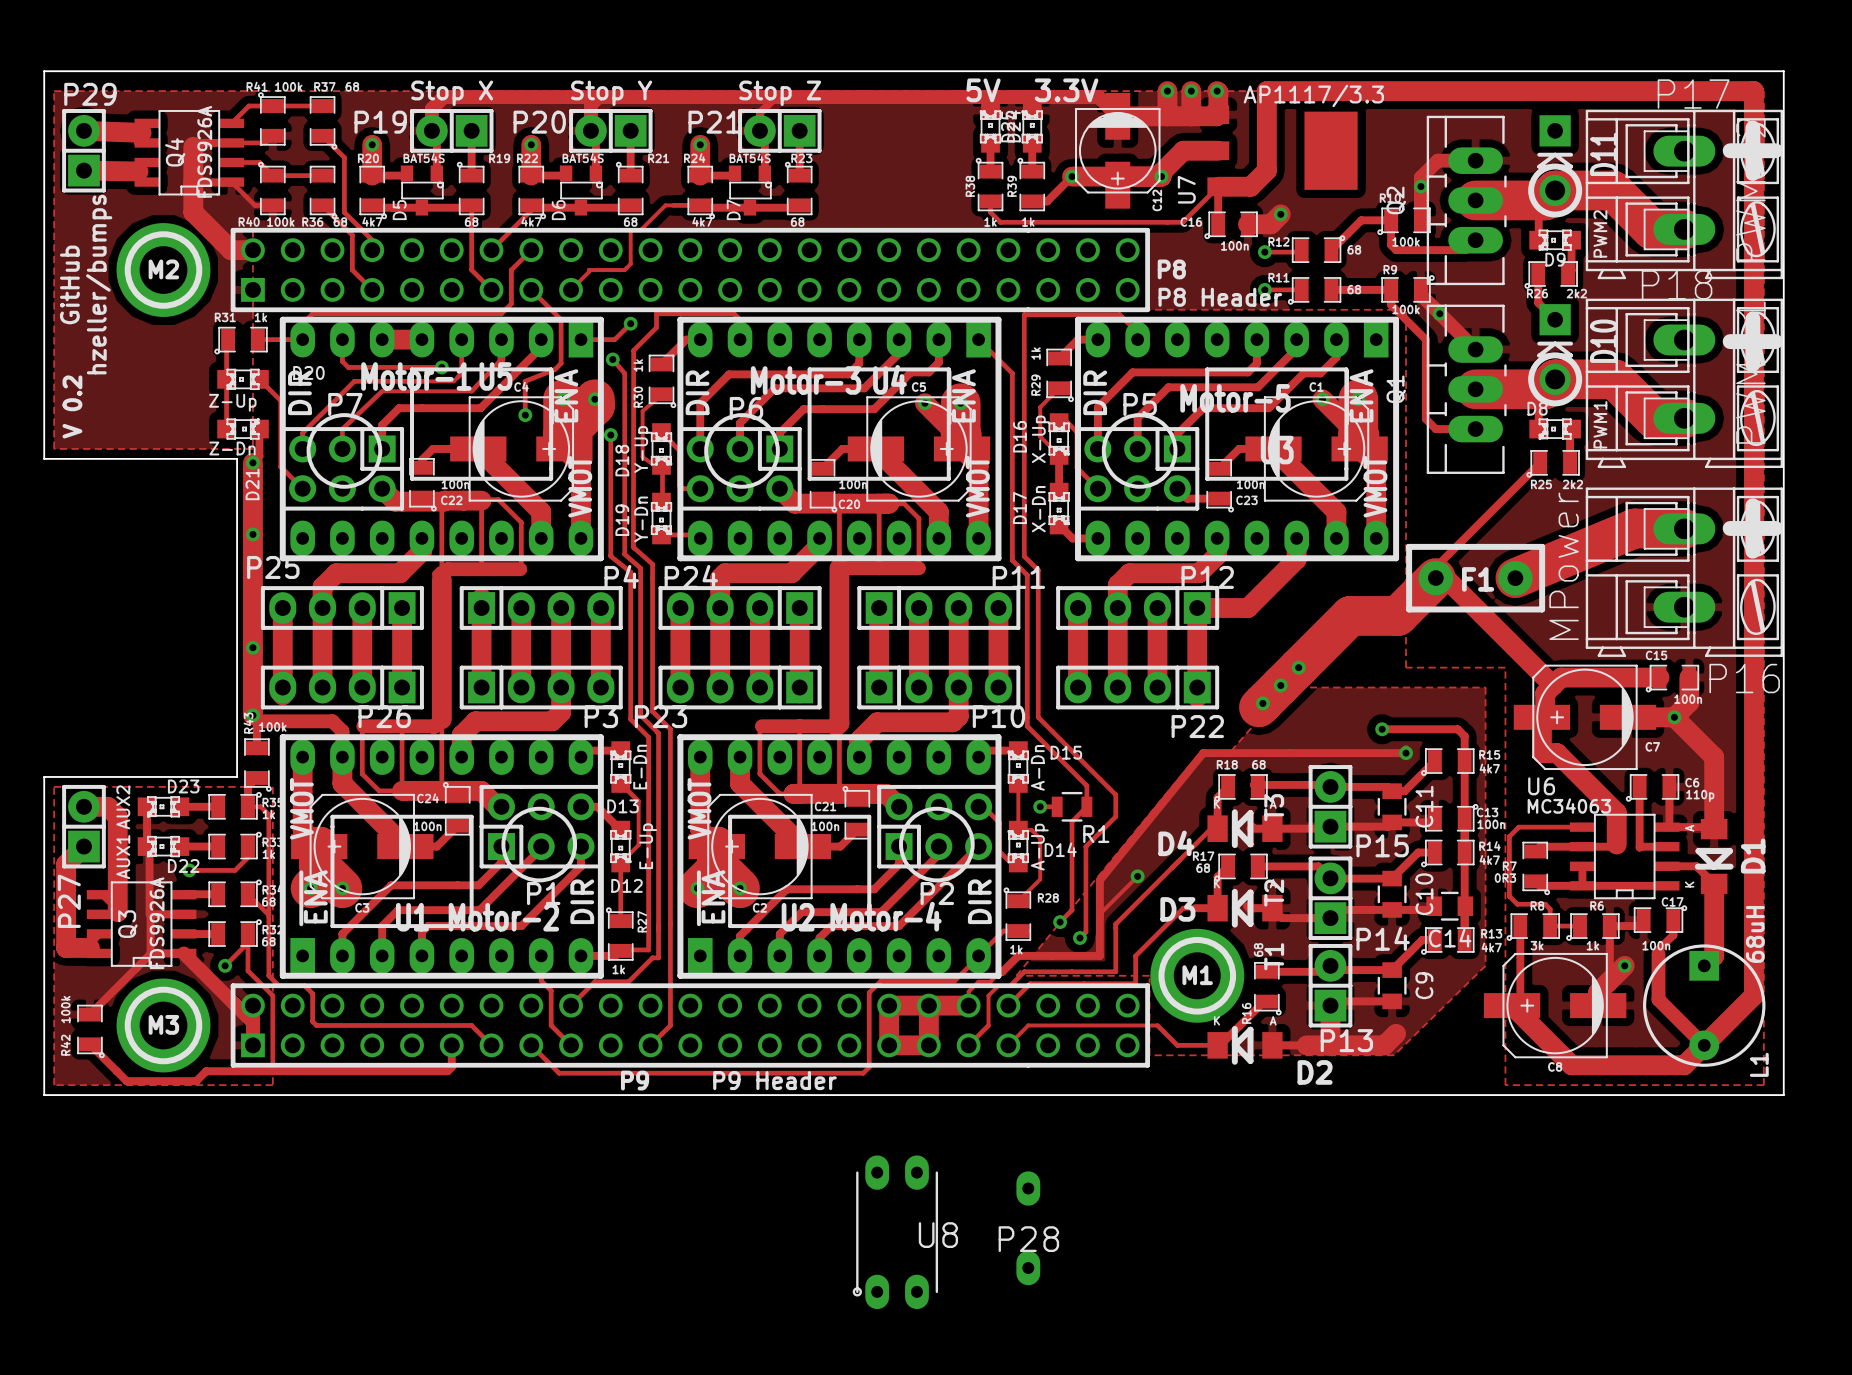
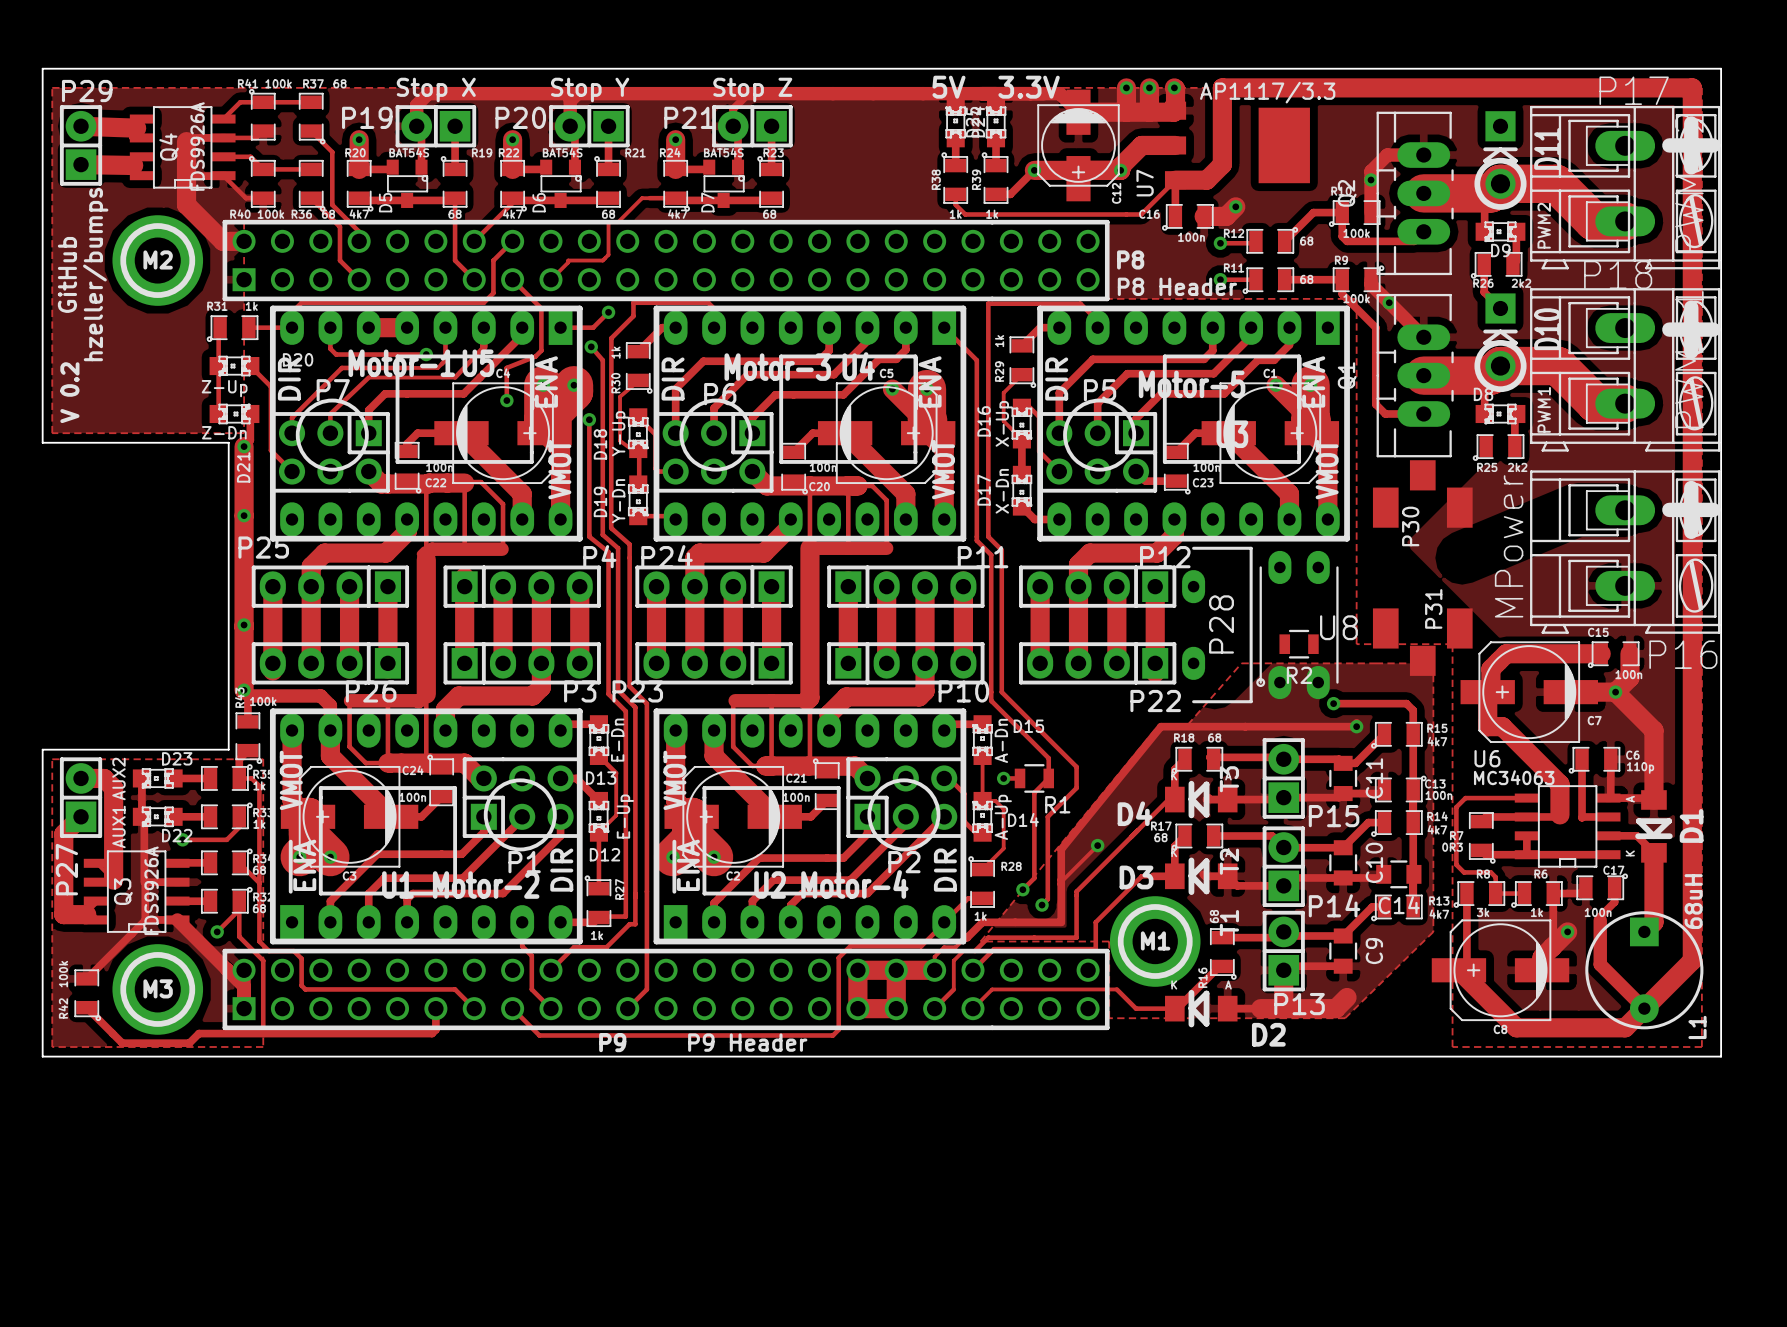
track: (1540, 462) (1435, 567) (1435, 578) (1397, 615) (1350, 615) (1258, 707) -> none
P30: none -> (1422, 493)
track: (1684, 528) (1634, 528) (1515, 578) -> none
track: (1296, 538) (1296, 559) (1247, 607) (1197, 607) -> none
line: none -> (1193, 548) (1251, 548) (1251, 701) (1193, 701)
track: (1445, 578) (1553, 685) -> none
F1: (1475, 578) -> none
P31: none -> (1422, 642)
via: (1298, 667) -> none
R2: none -> (1299, 644)
via: (1280, 685) -> none
via: (1262, 703) -> none
P28 position: (1028, 1228) -> (1193, 625)
U8 position: (895, 1232) -> (1297, 625)
P28 name rotation: 0° (1028, 1239) -> 90° counterclockwise (1221, 624)

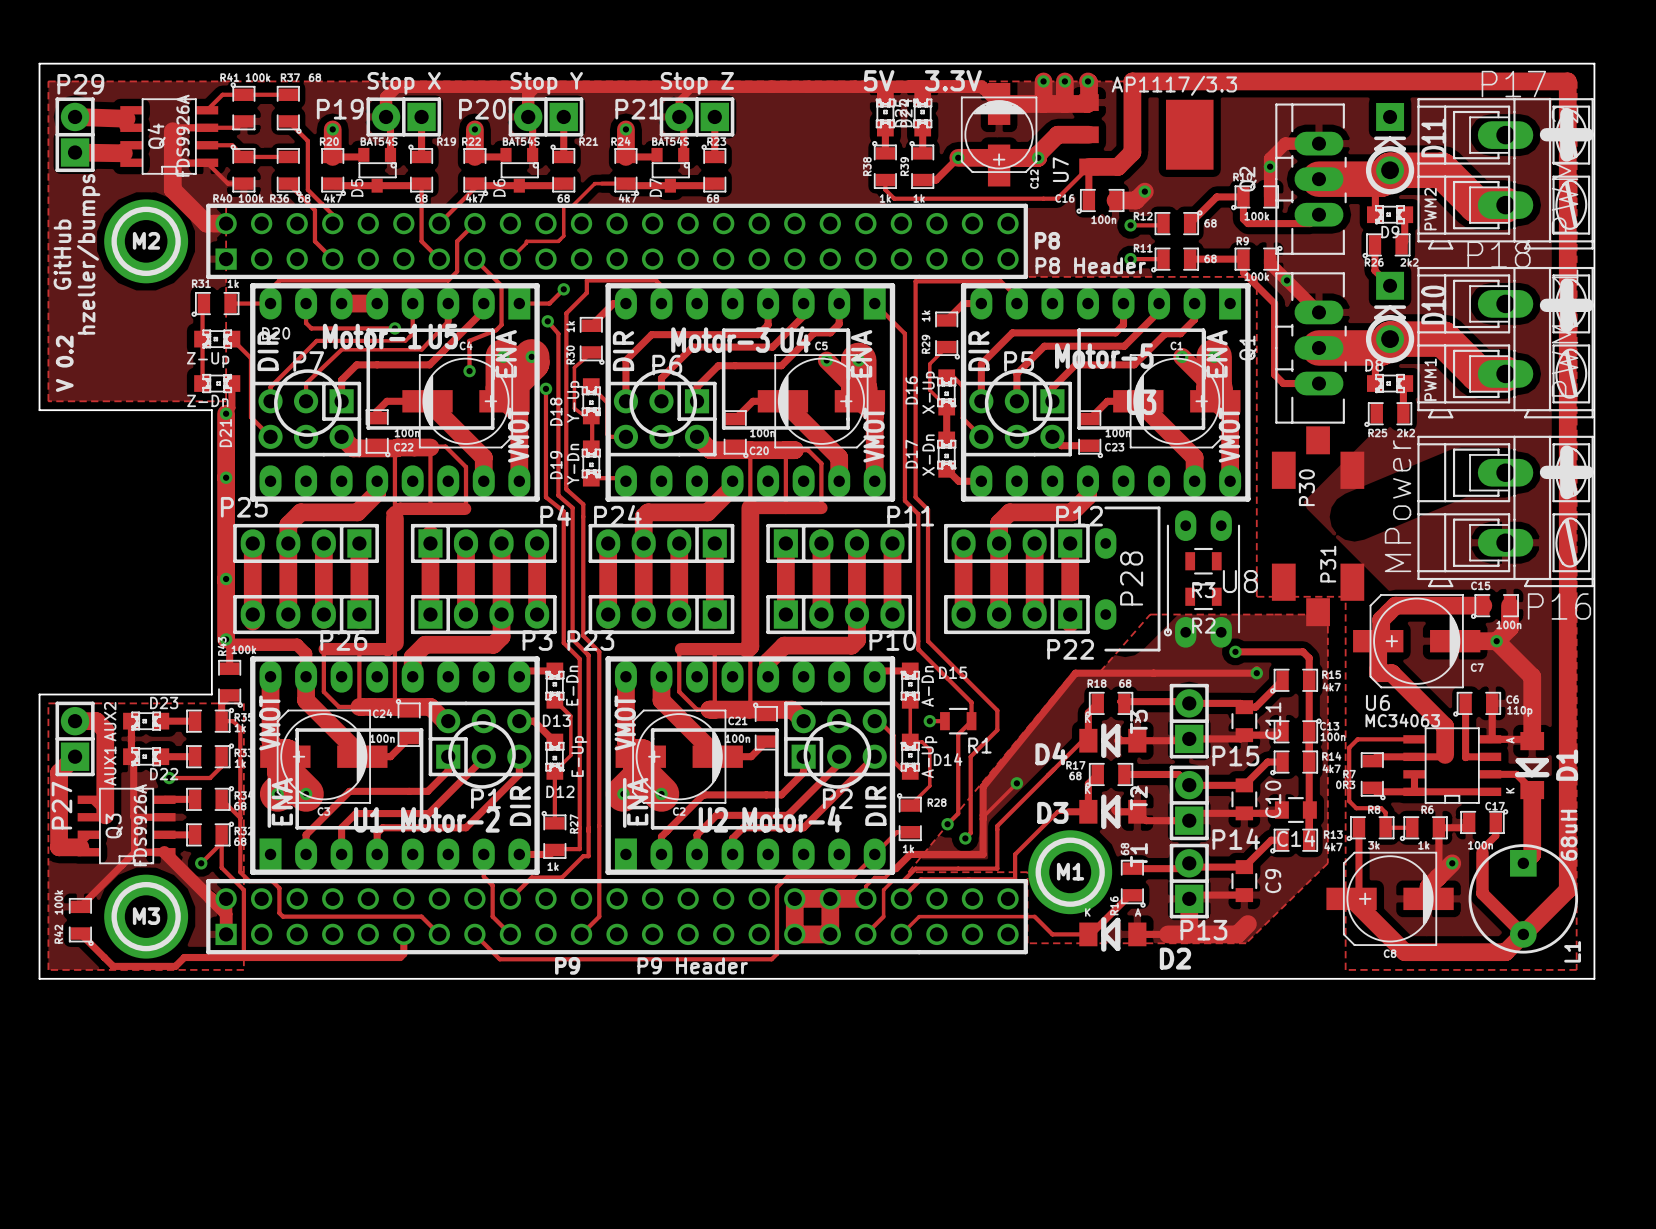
R3: none -> (1203, 561)

